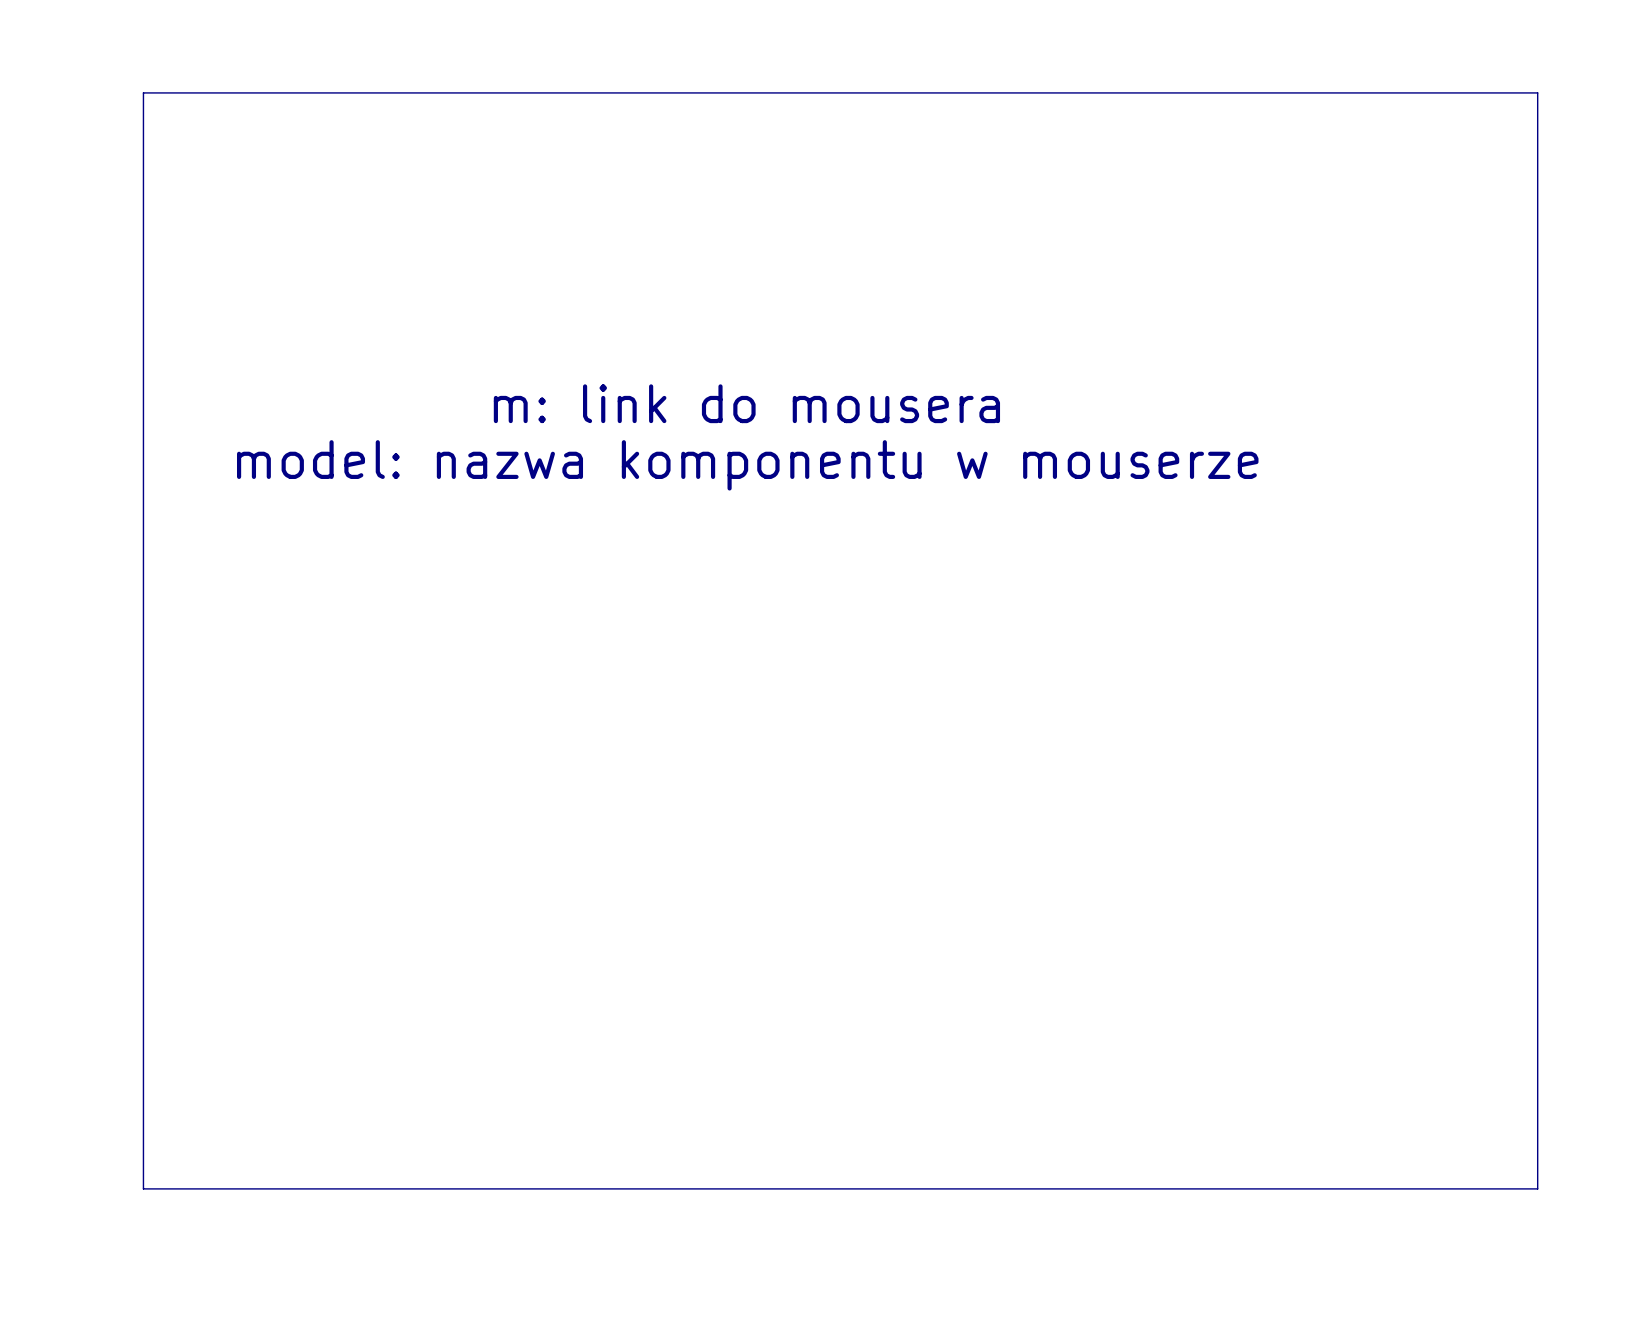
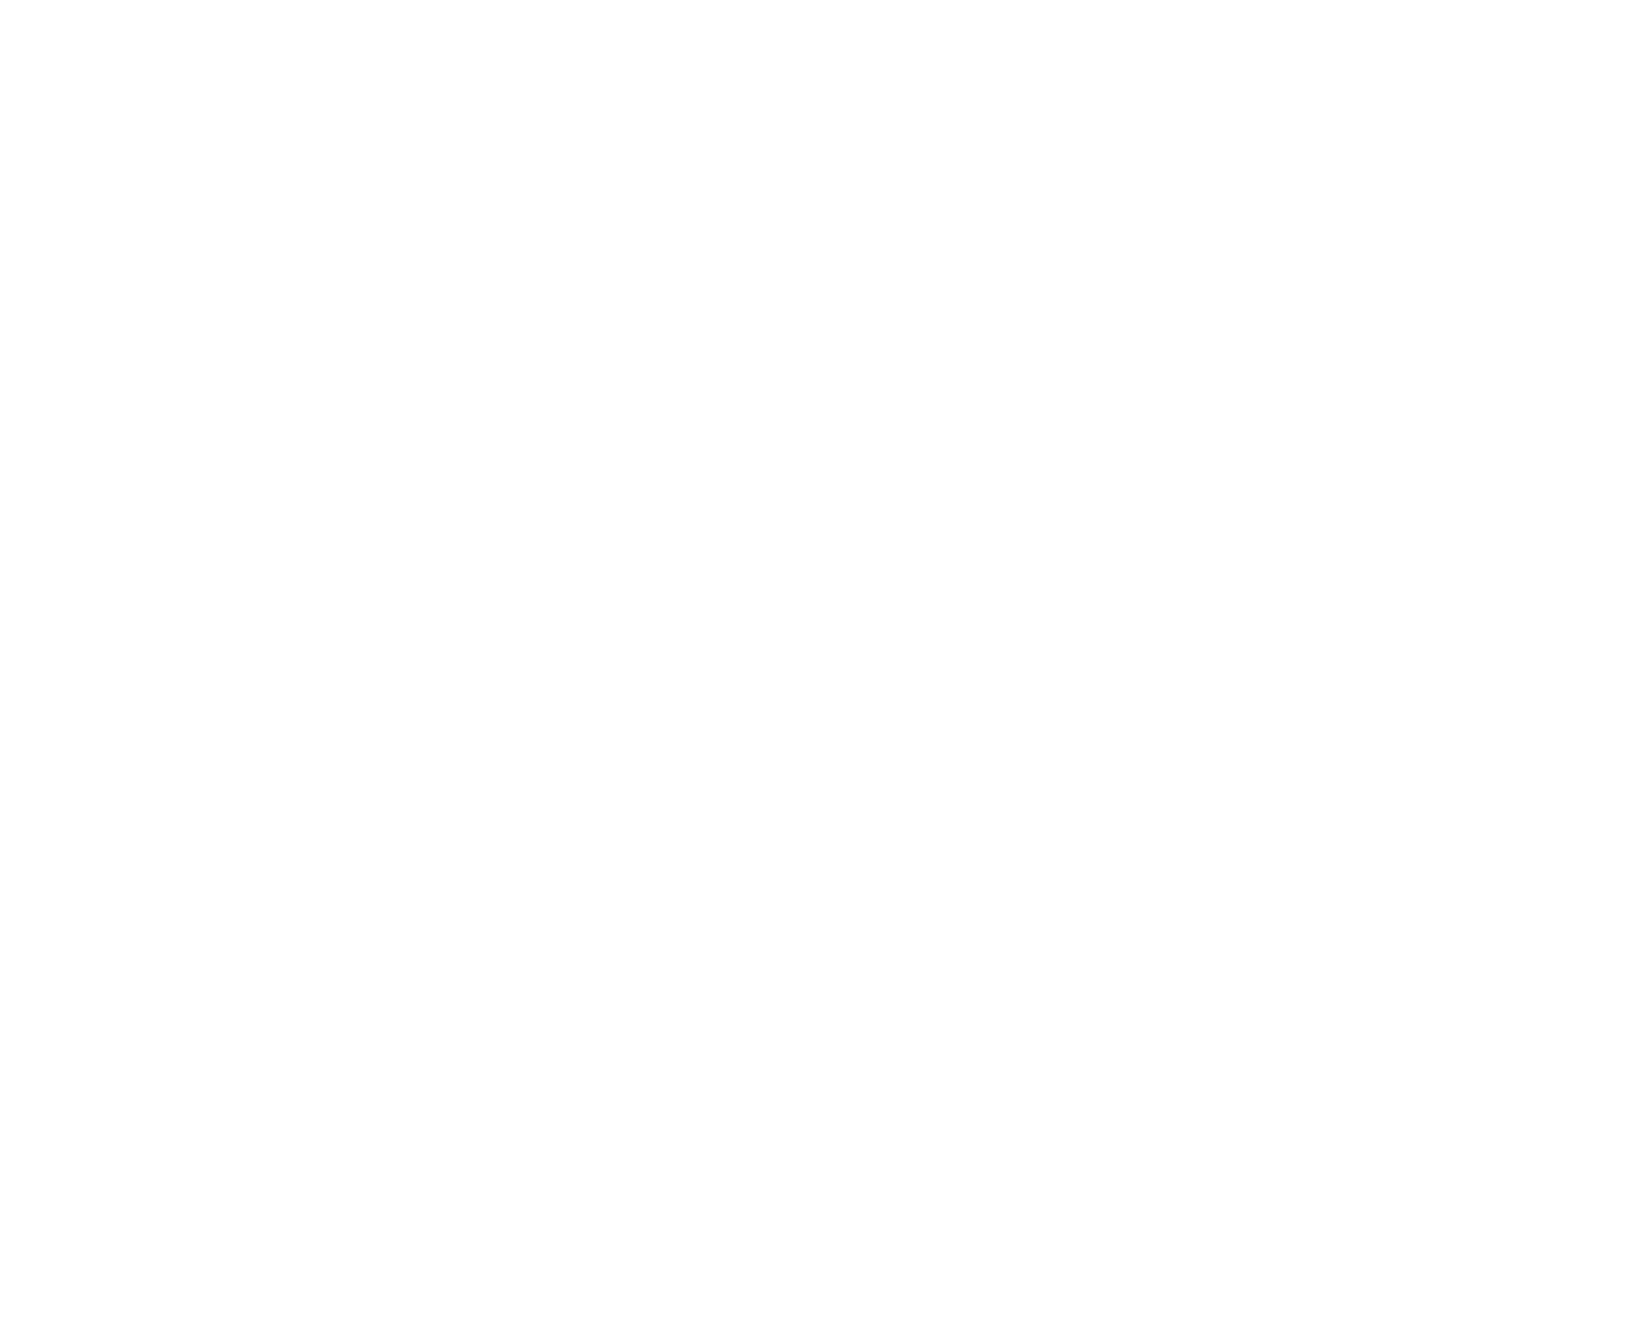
line: (143, 92) (1537, 92) (1537, 1188) (143, 1188) (143, 92) -> none
text: m: link do mousera (746, 403) -> none
text: model: nazwa komponentu w mouserze (747, 465) -> none

